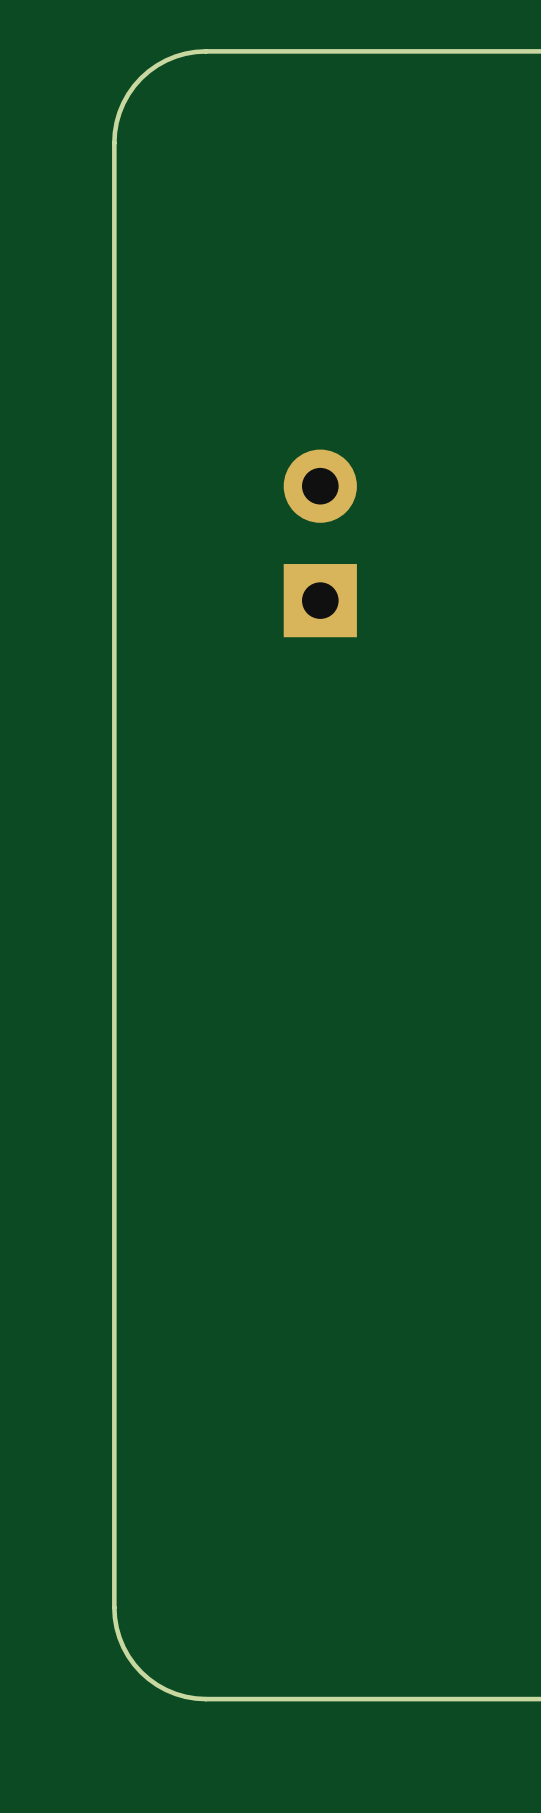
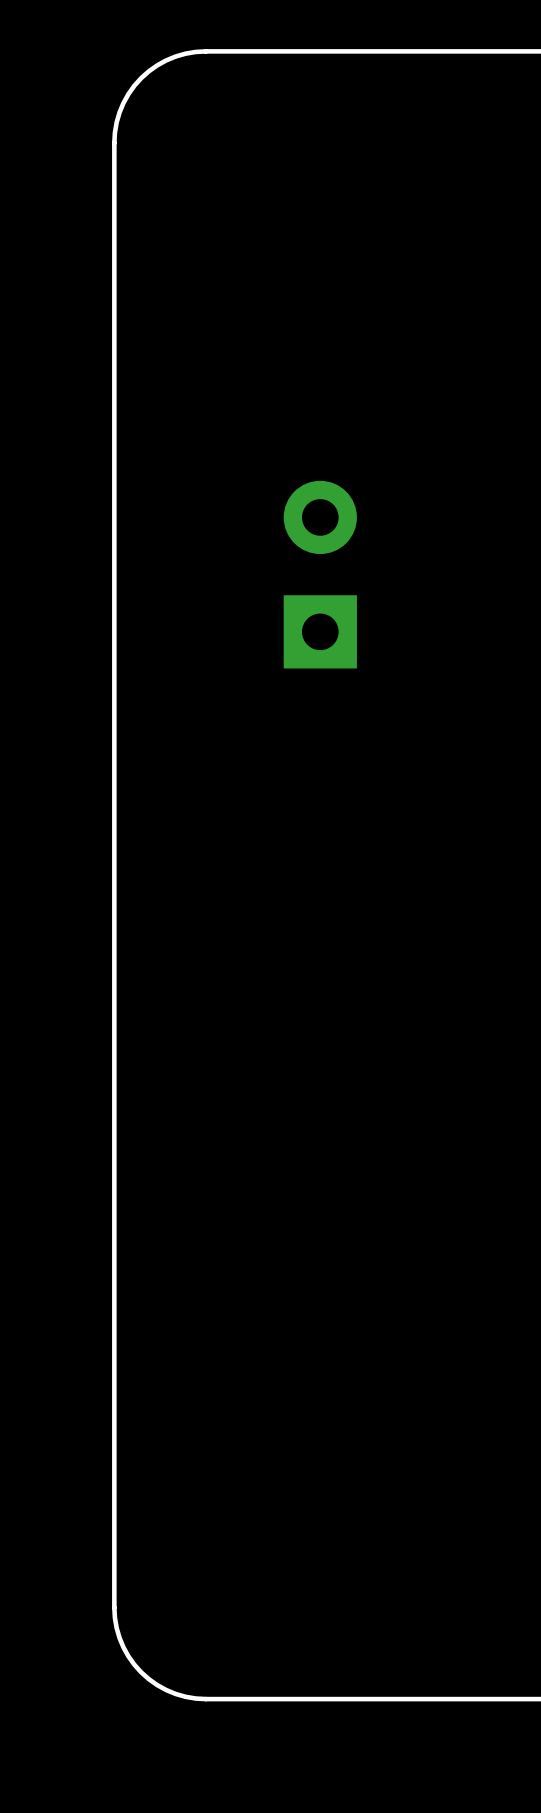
part position: (320, 543) -> (320, 574)

